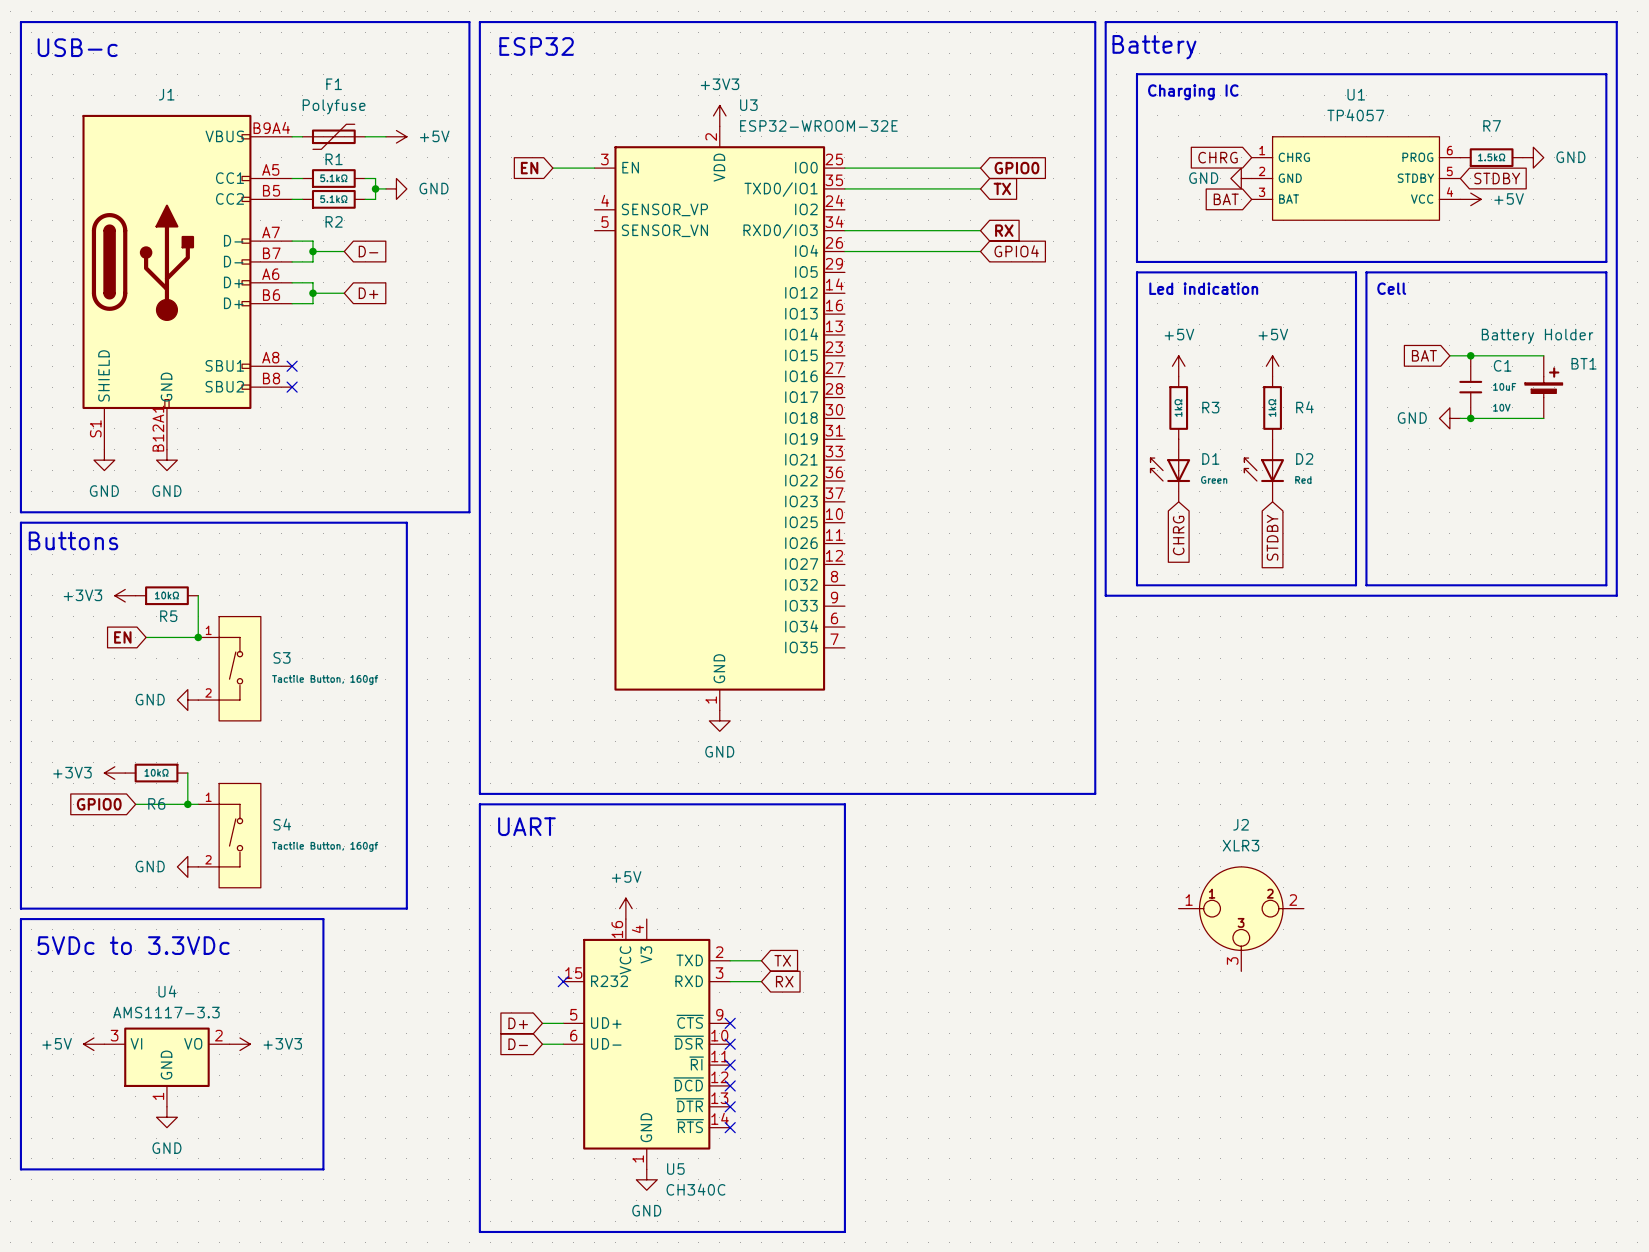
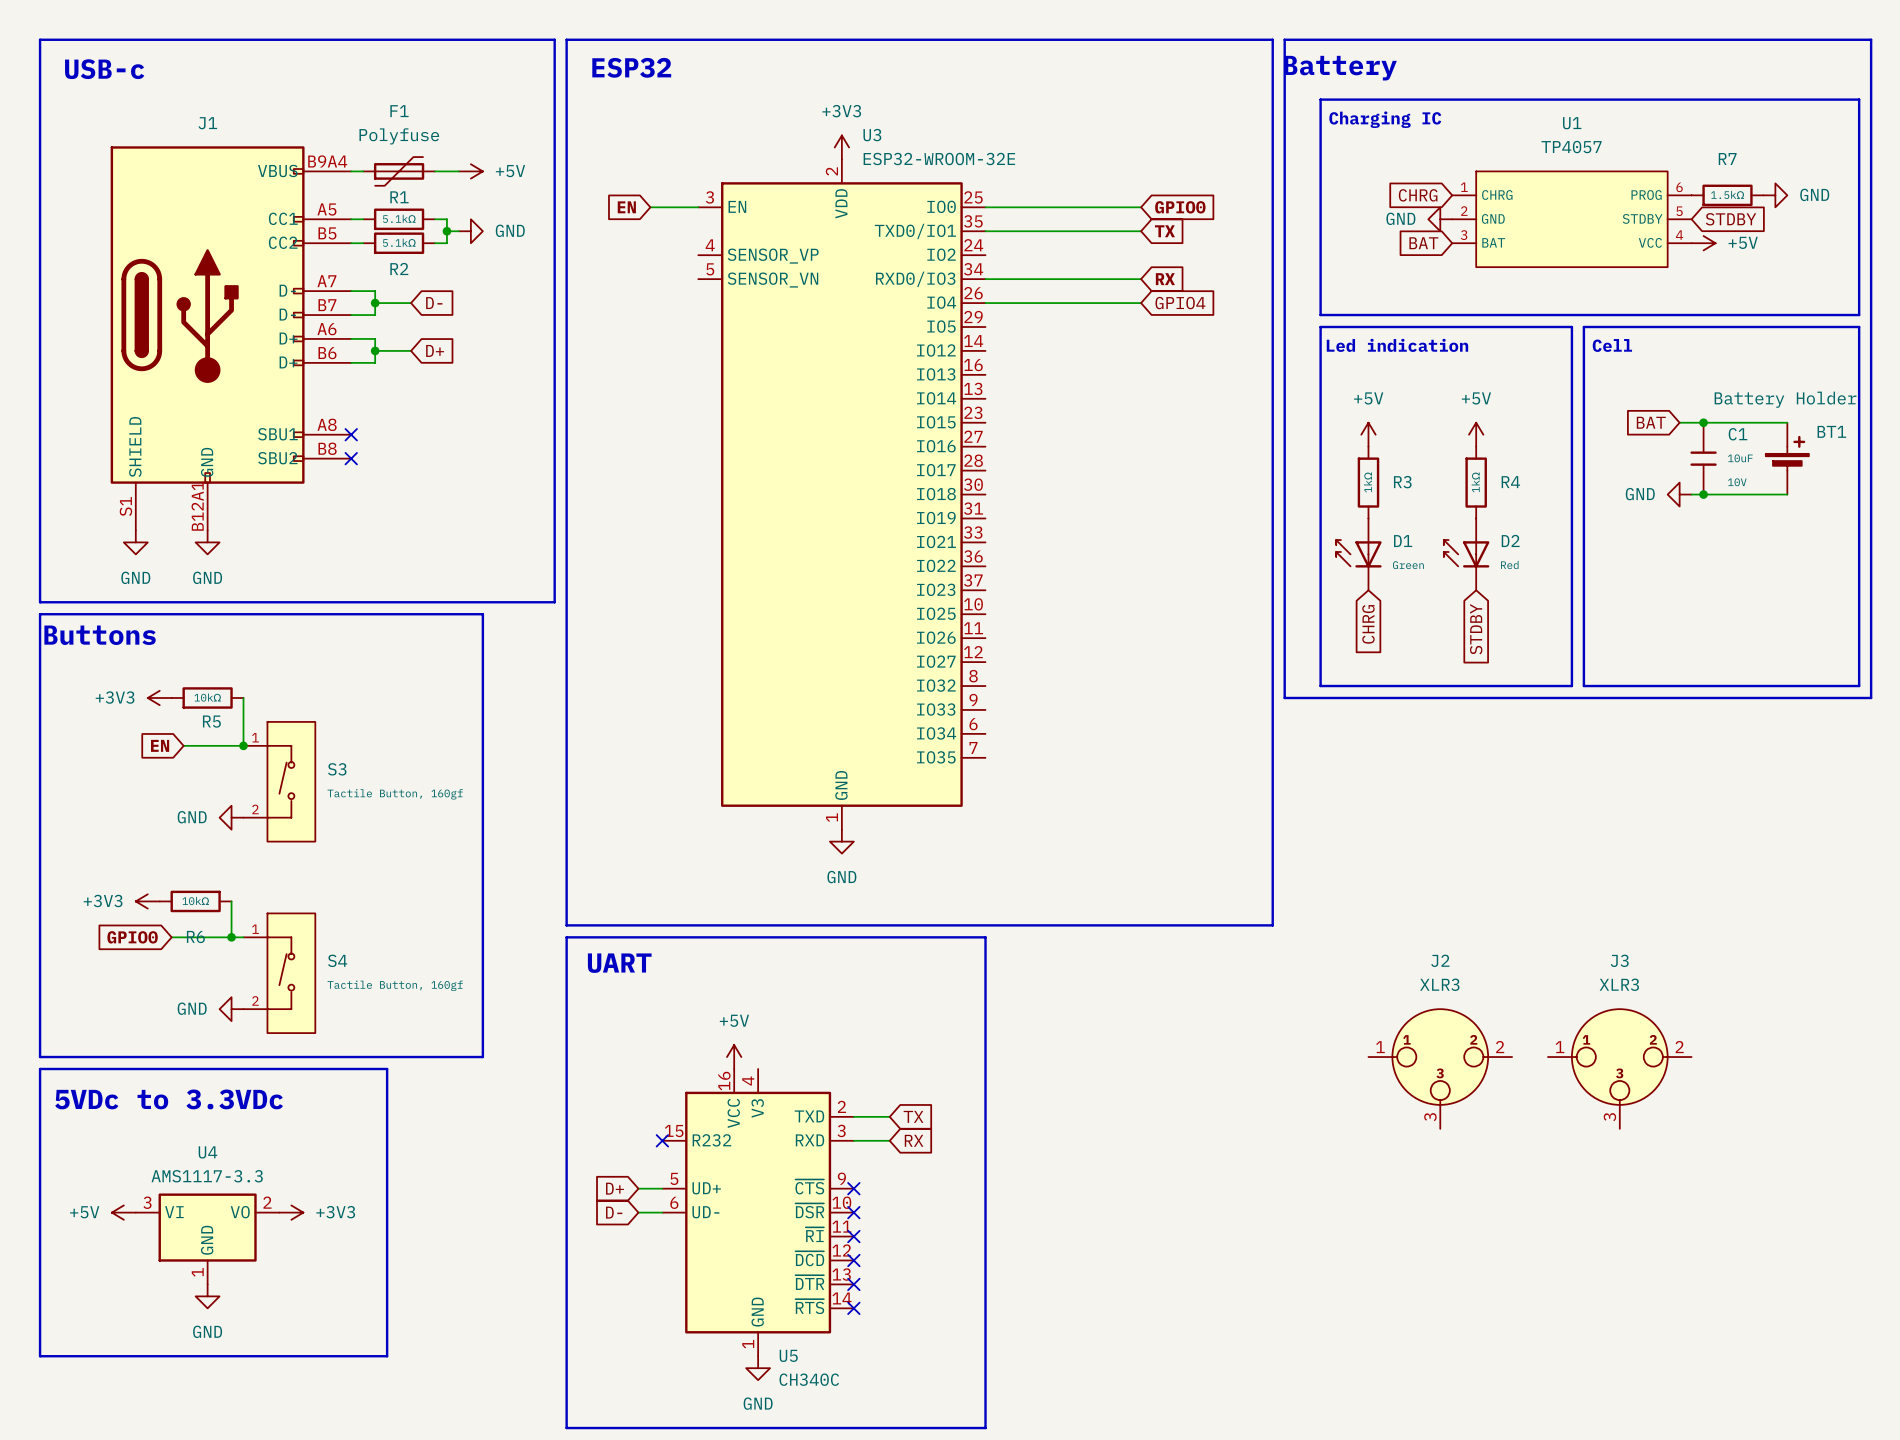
J3: none -> XLR3 (1619, 1068)

